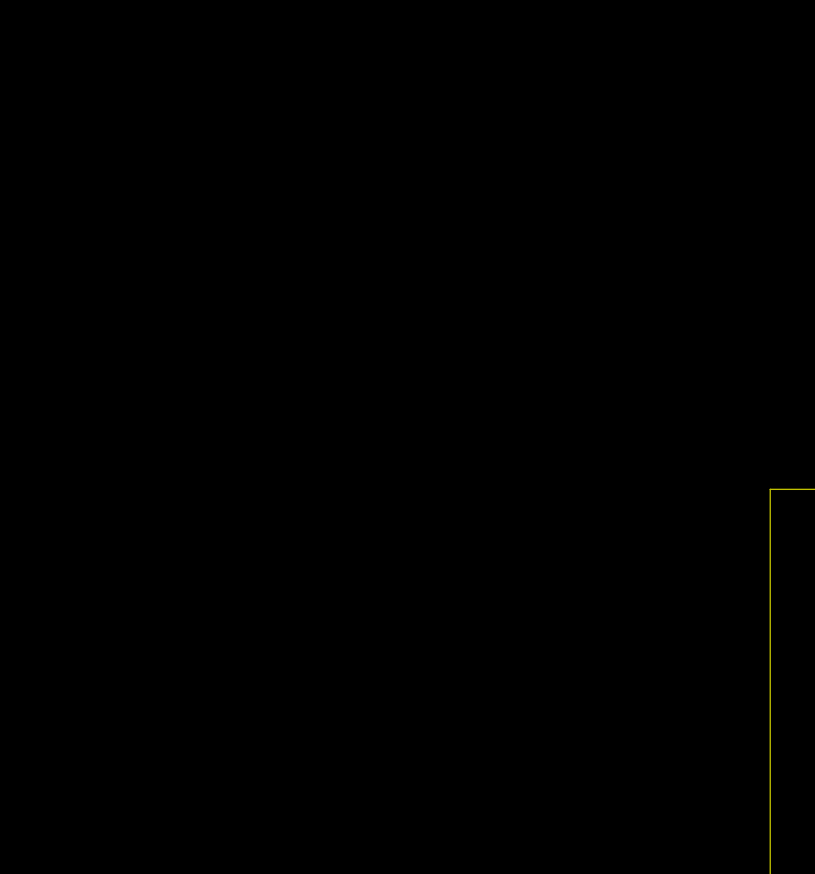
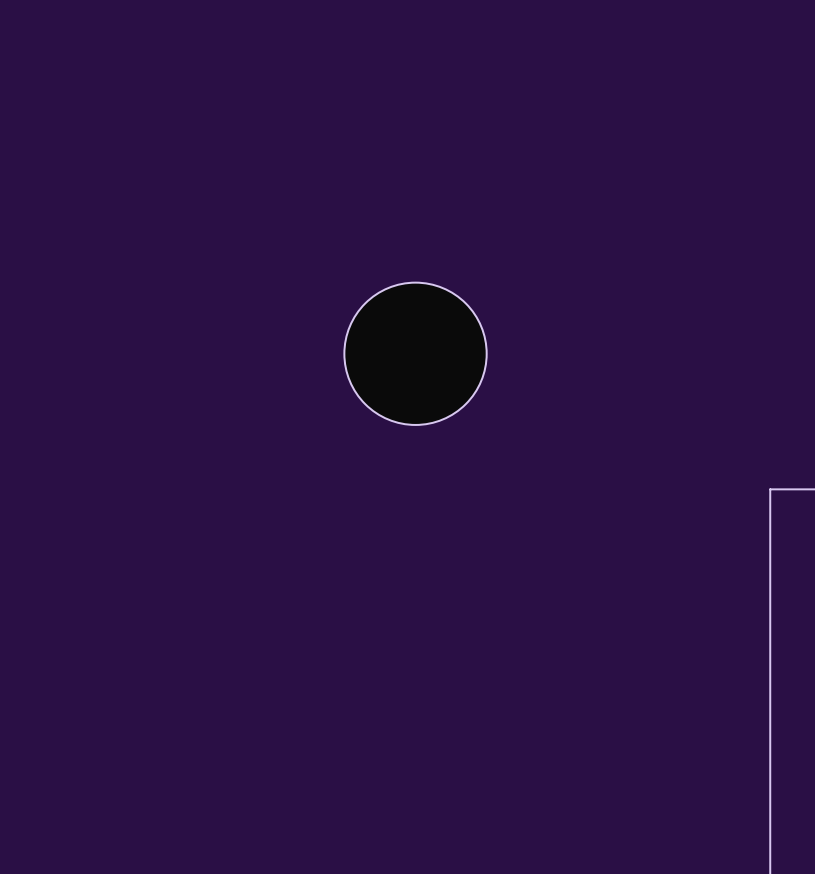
hole: none -> (415, 353)

